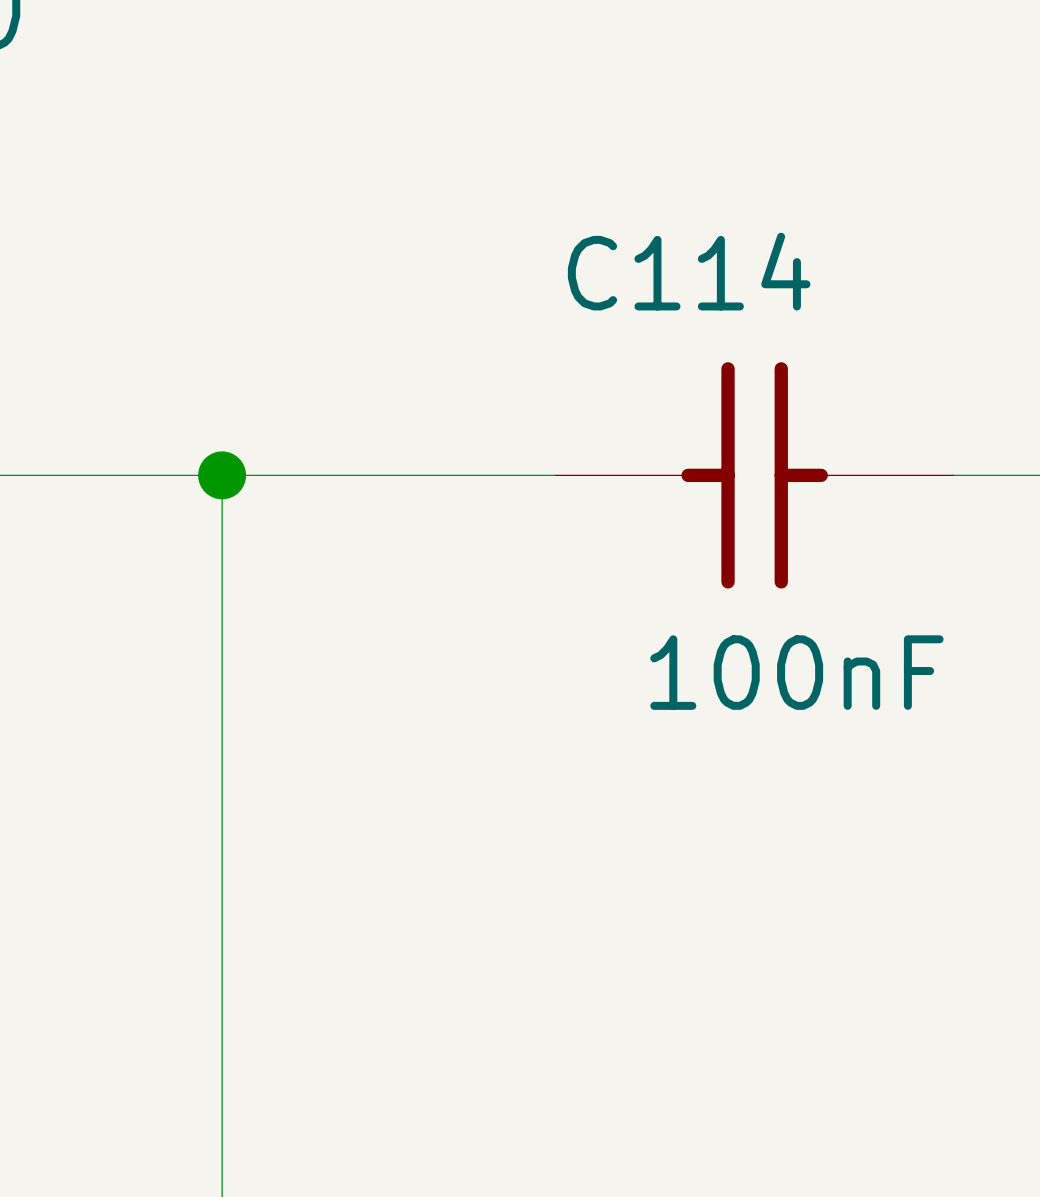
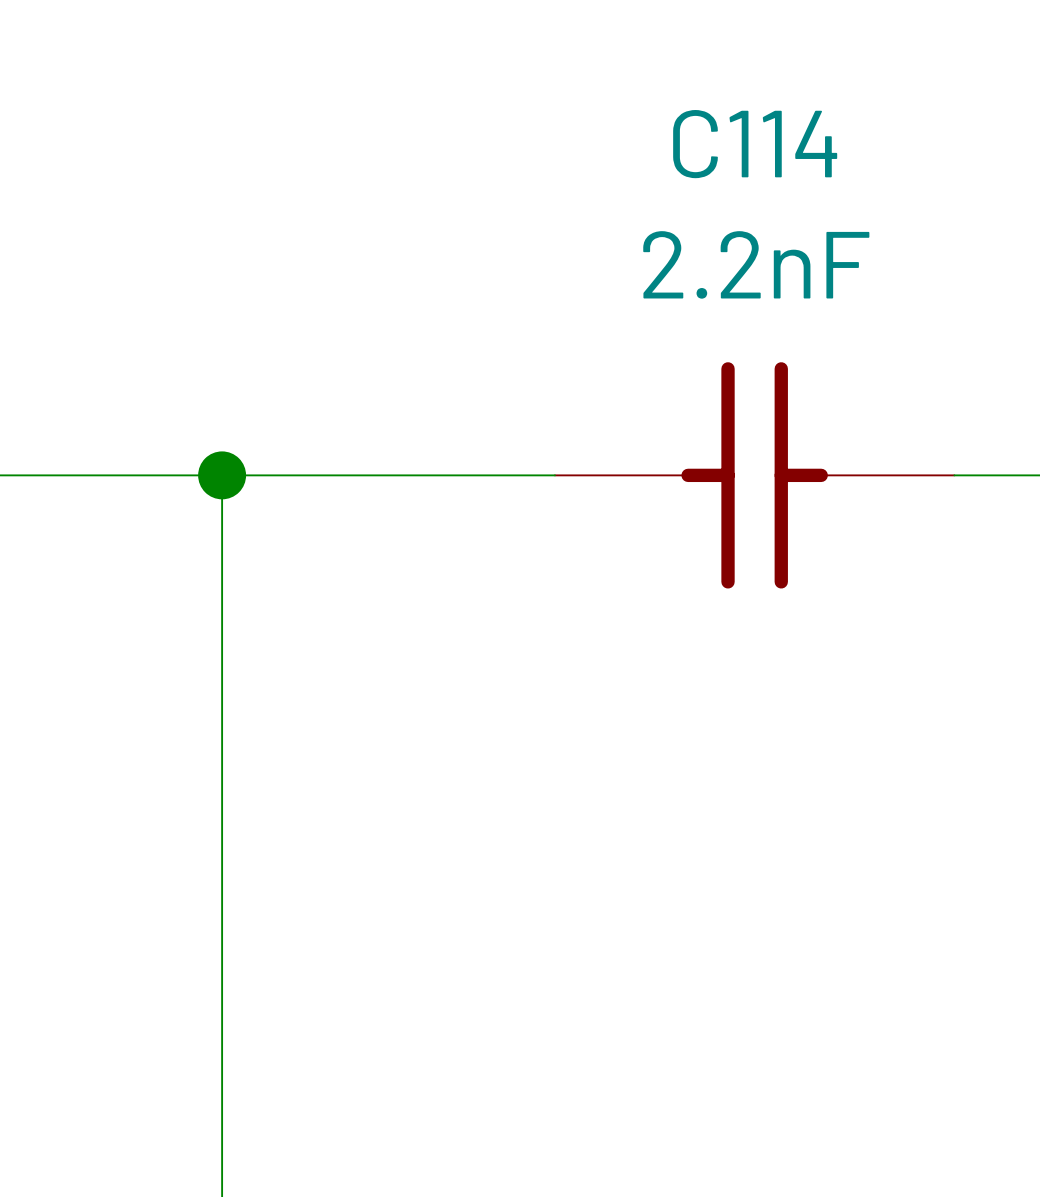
C114 name position: C114 (689, 271) -> C114 (755, 144)
C114 text: 100nF (796, 672) -> 2.2nF (756, 264)

